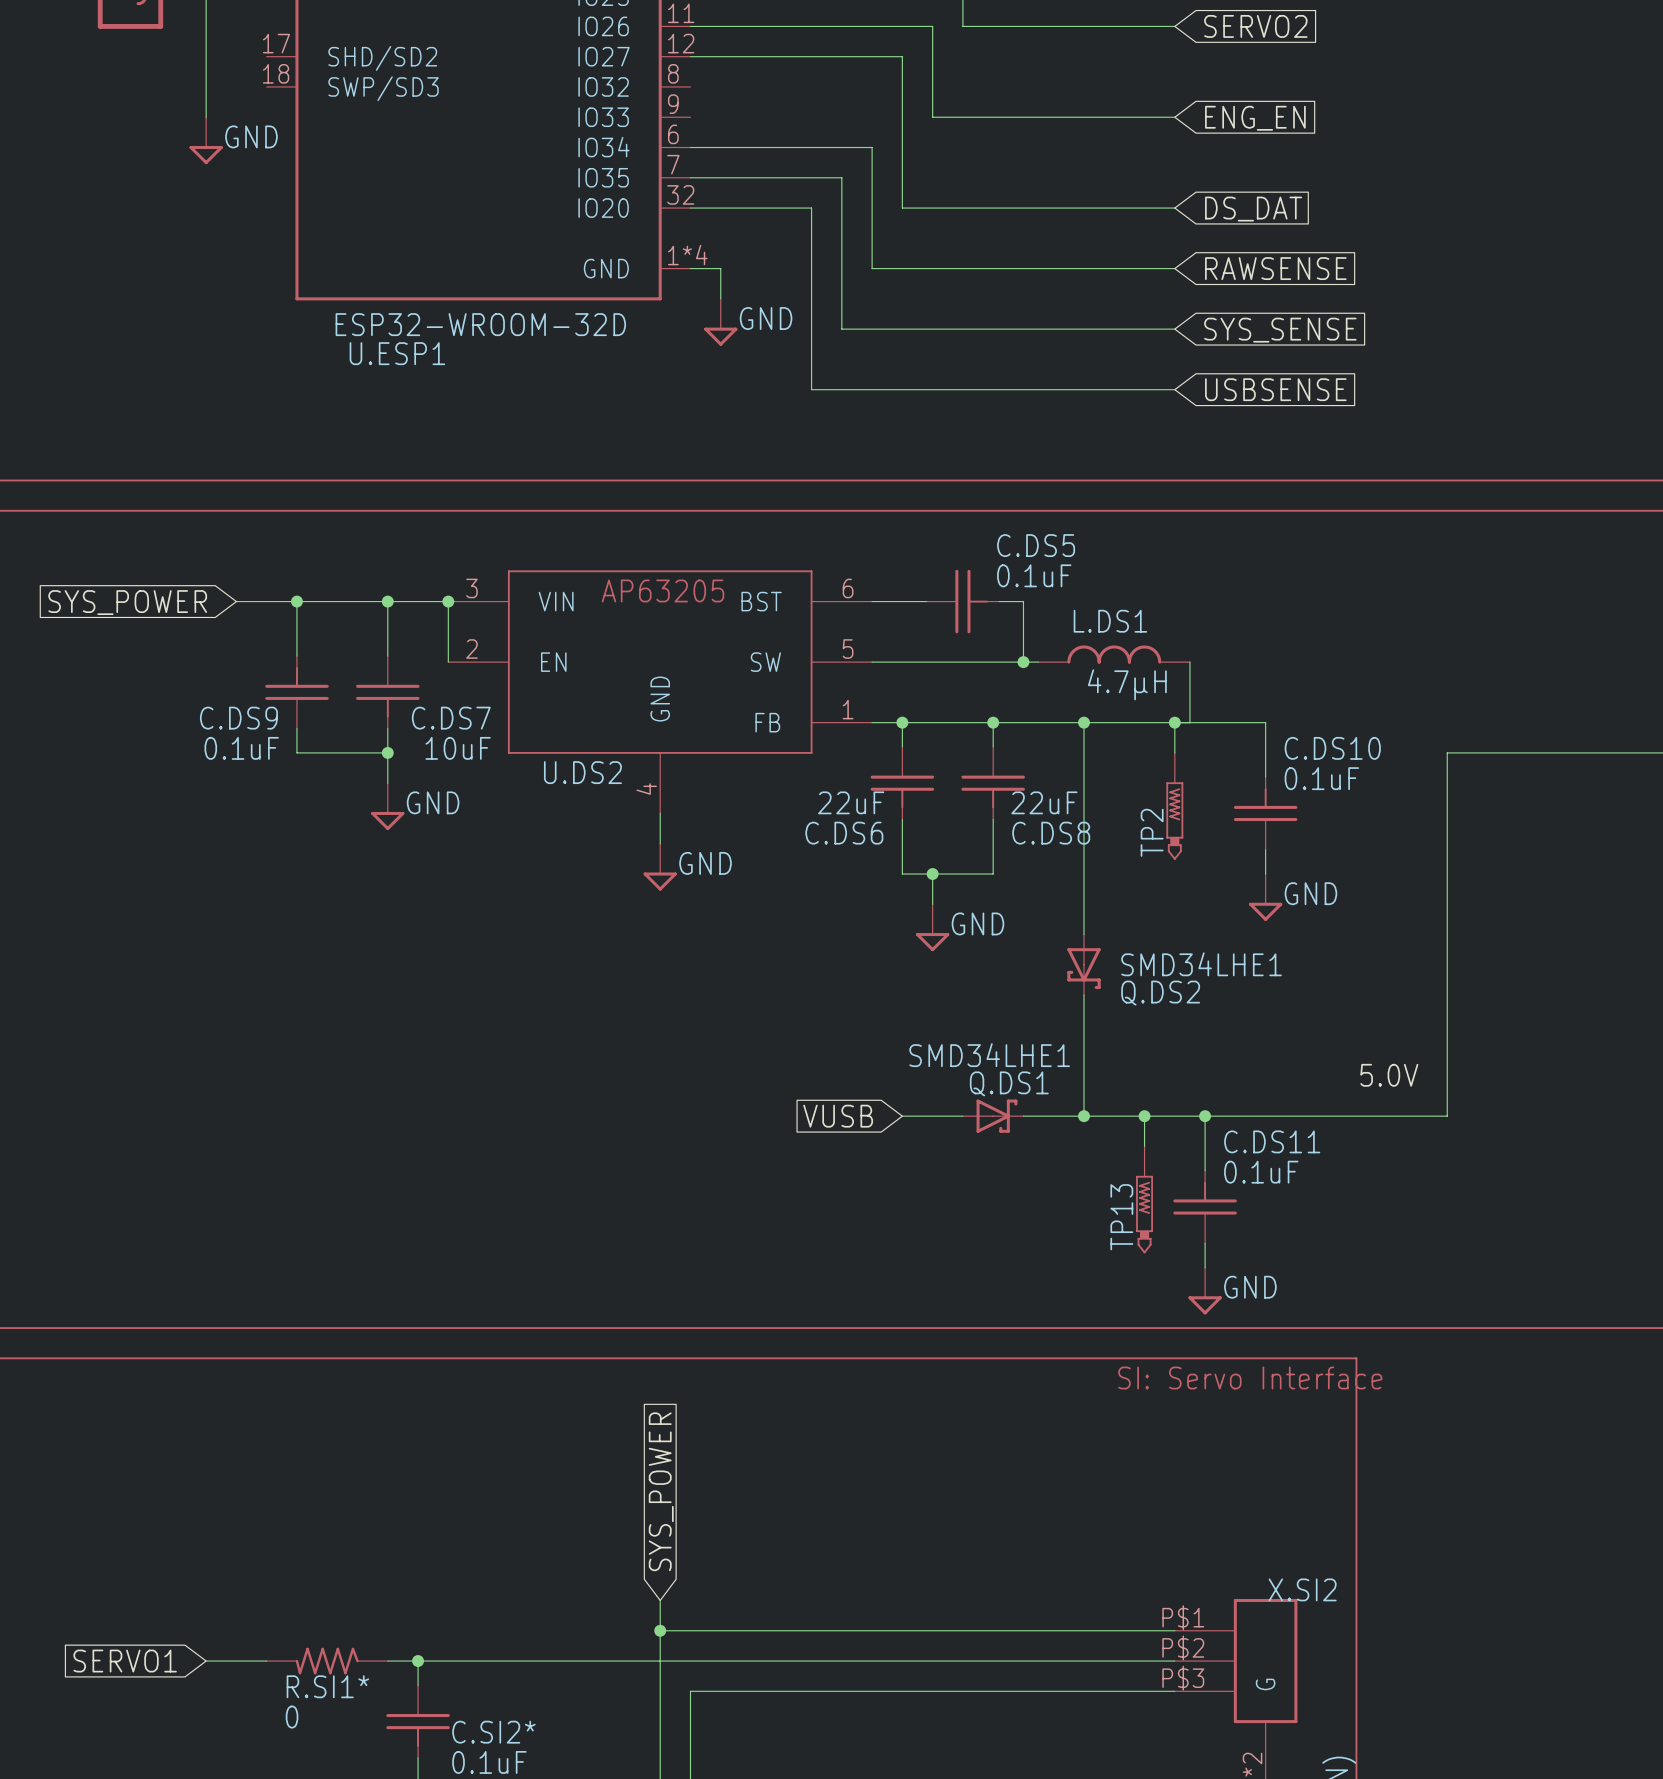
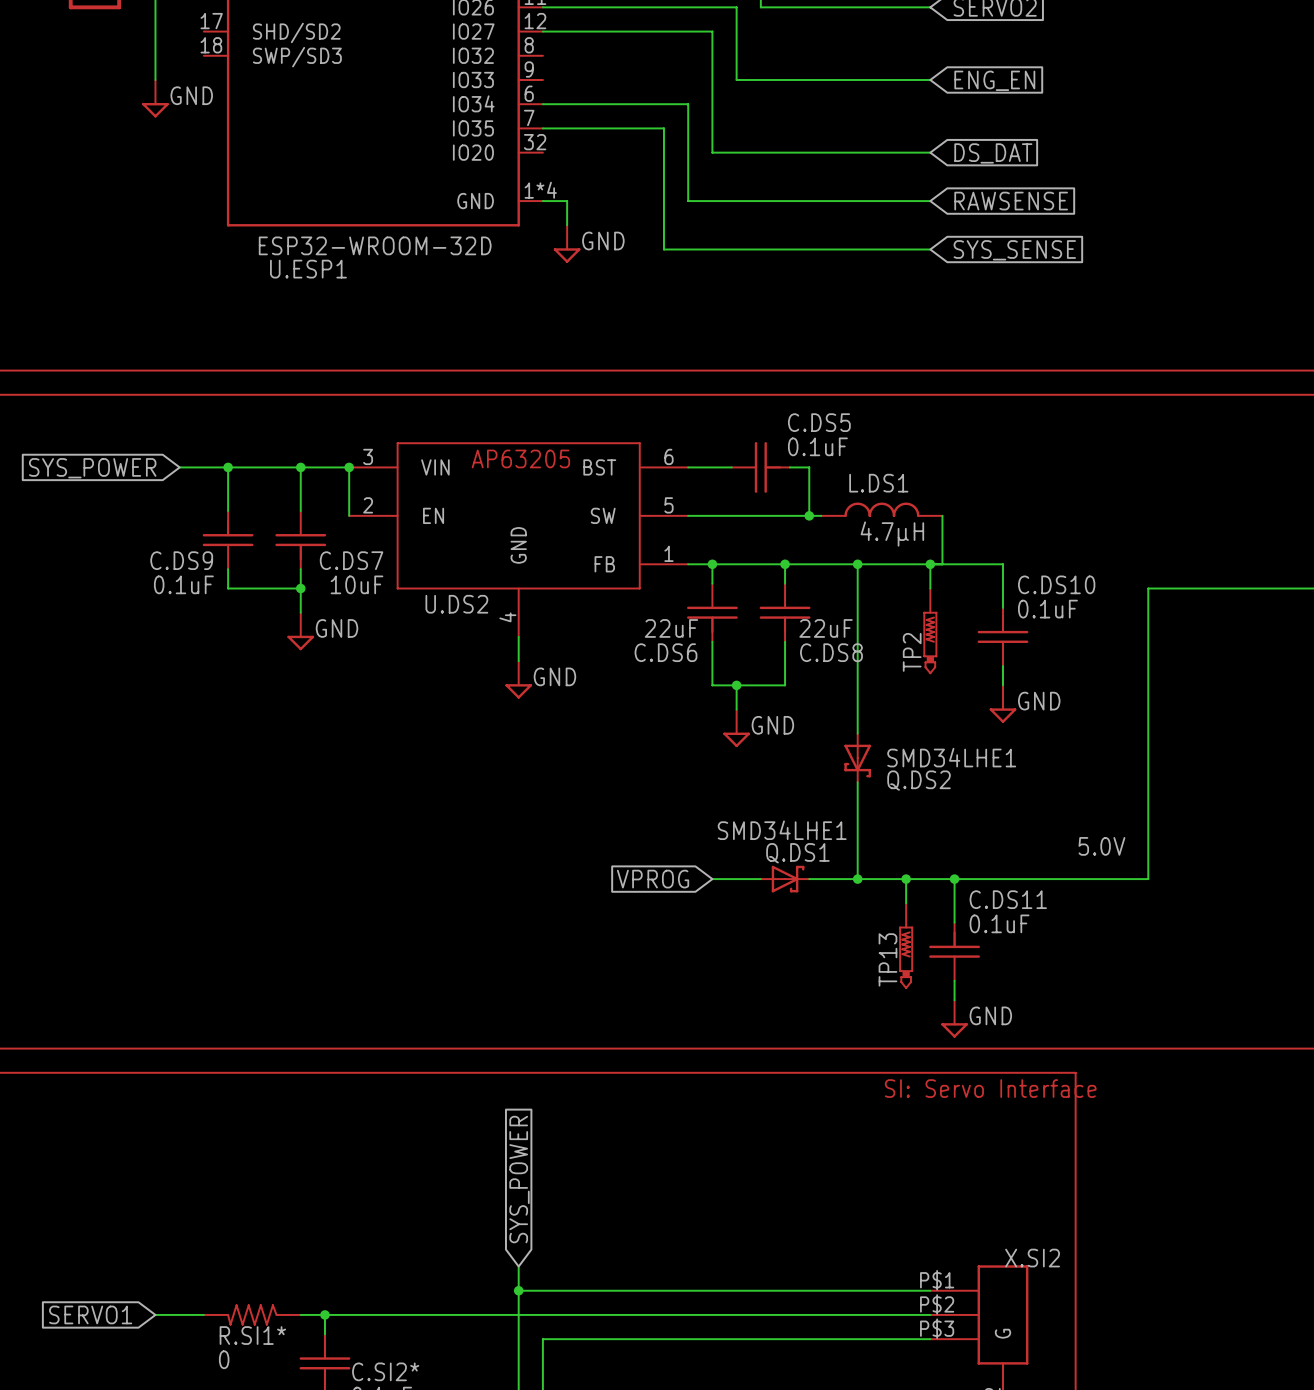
wire: (690, 208) (811, 208) (811, 389) (1174, 389) -> none
global label: USBSENSE (1275, 389) -> none
global label: VUSB (838, 1116) -> VPROG (653, 879)

